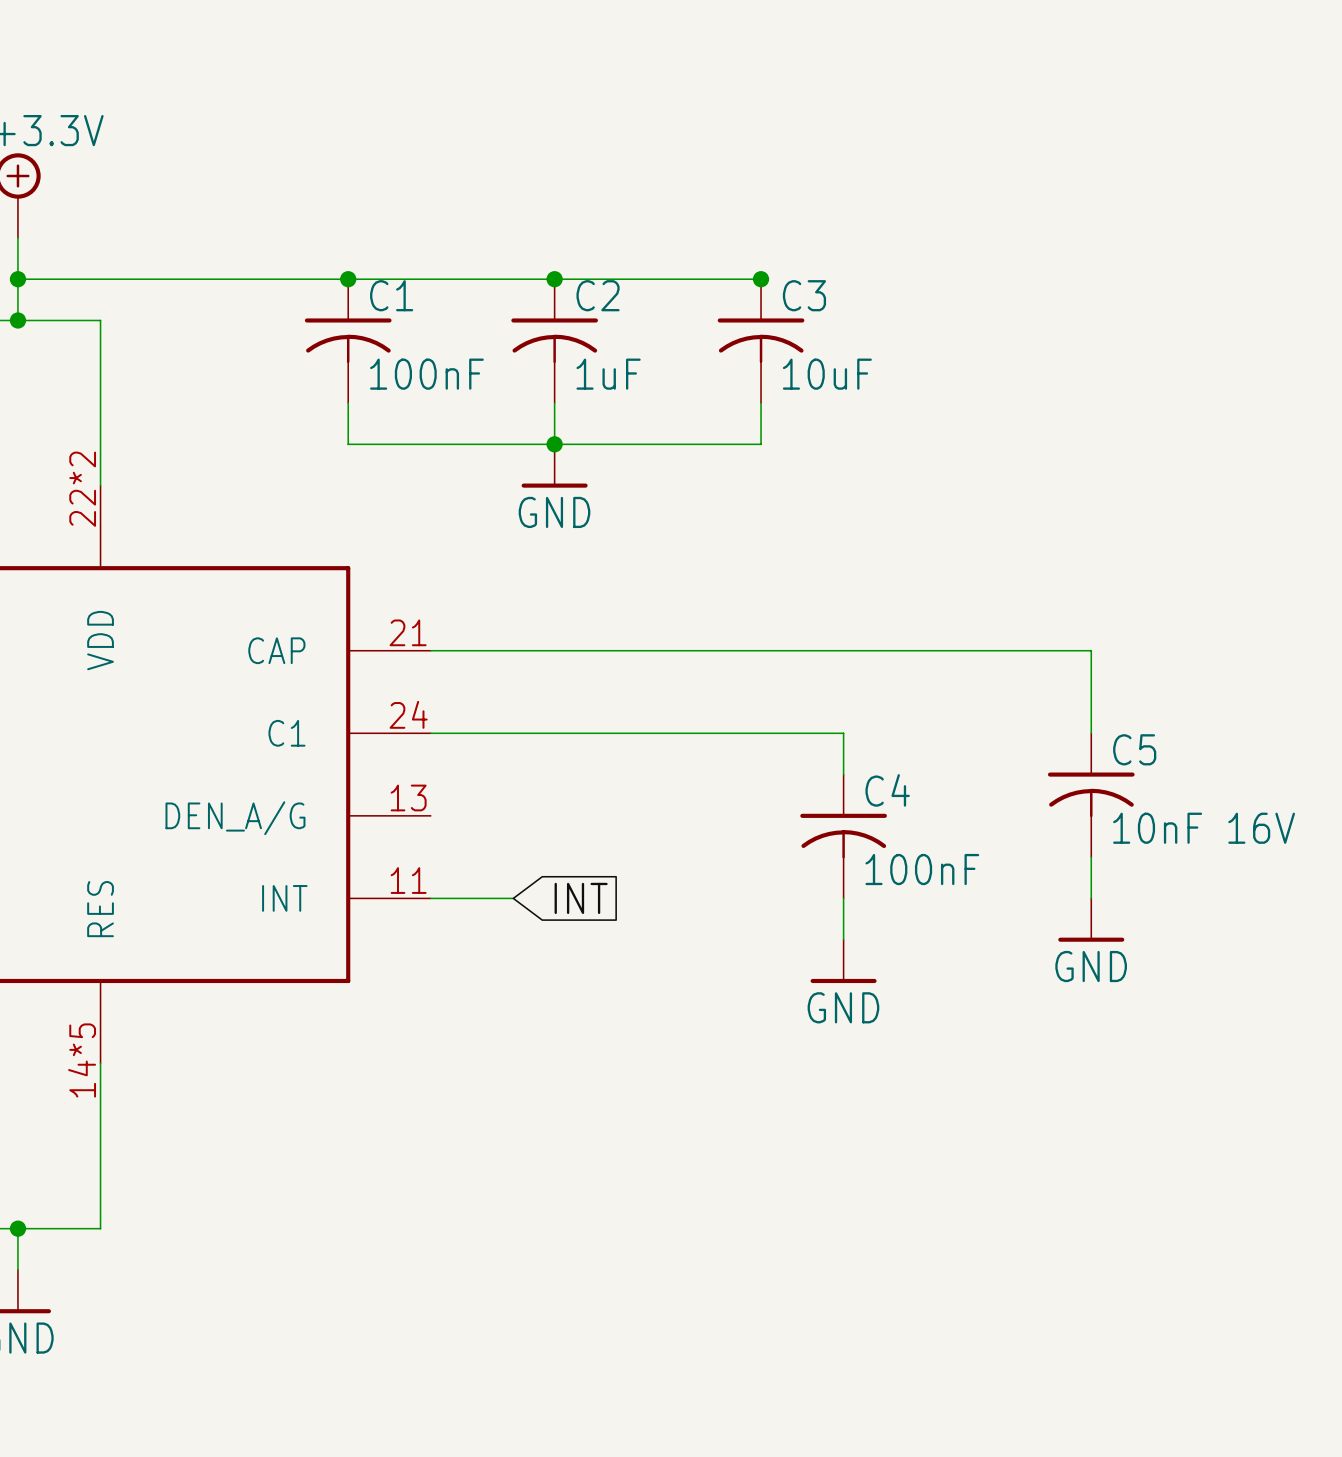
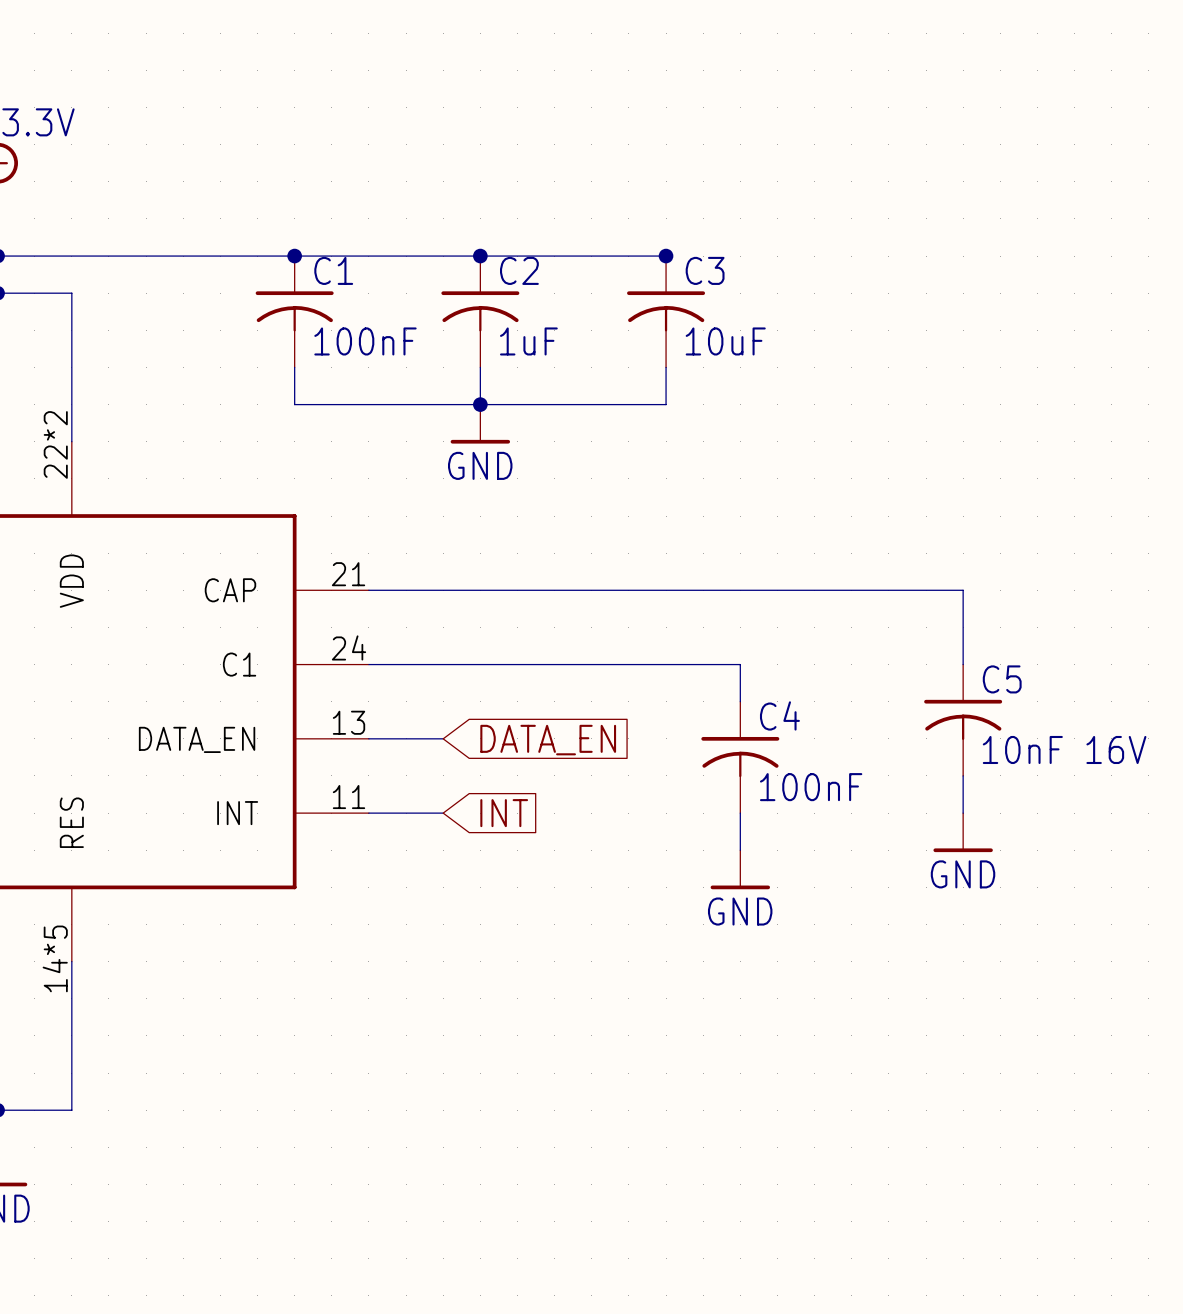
wire: none -> (368, 738) (443, 738)
global label: none -> DATA_EN (548, 740)
part pin name: DEN_A/G (235, 818) -> DATA_EN (197, 739)

